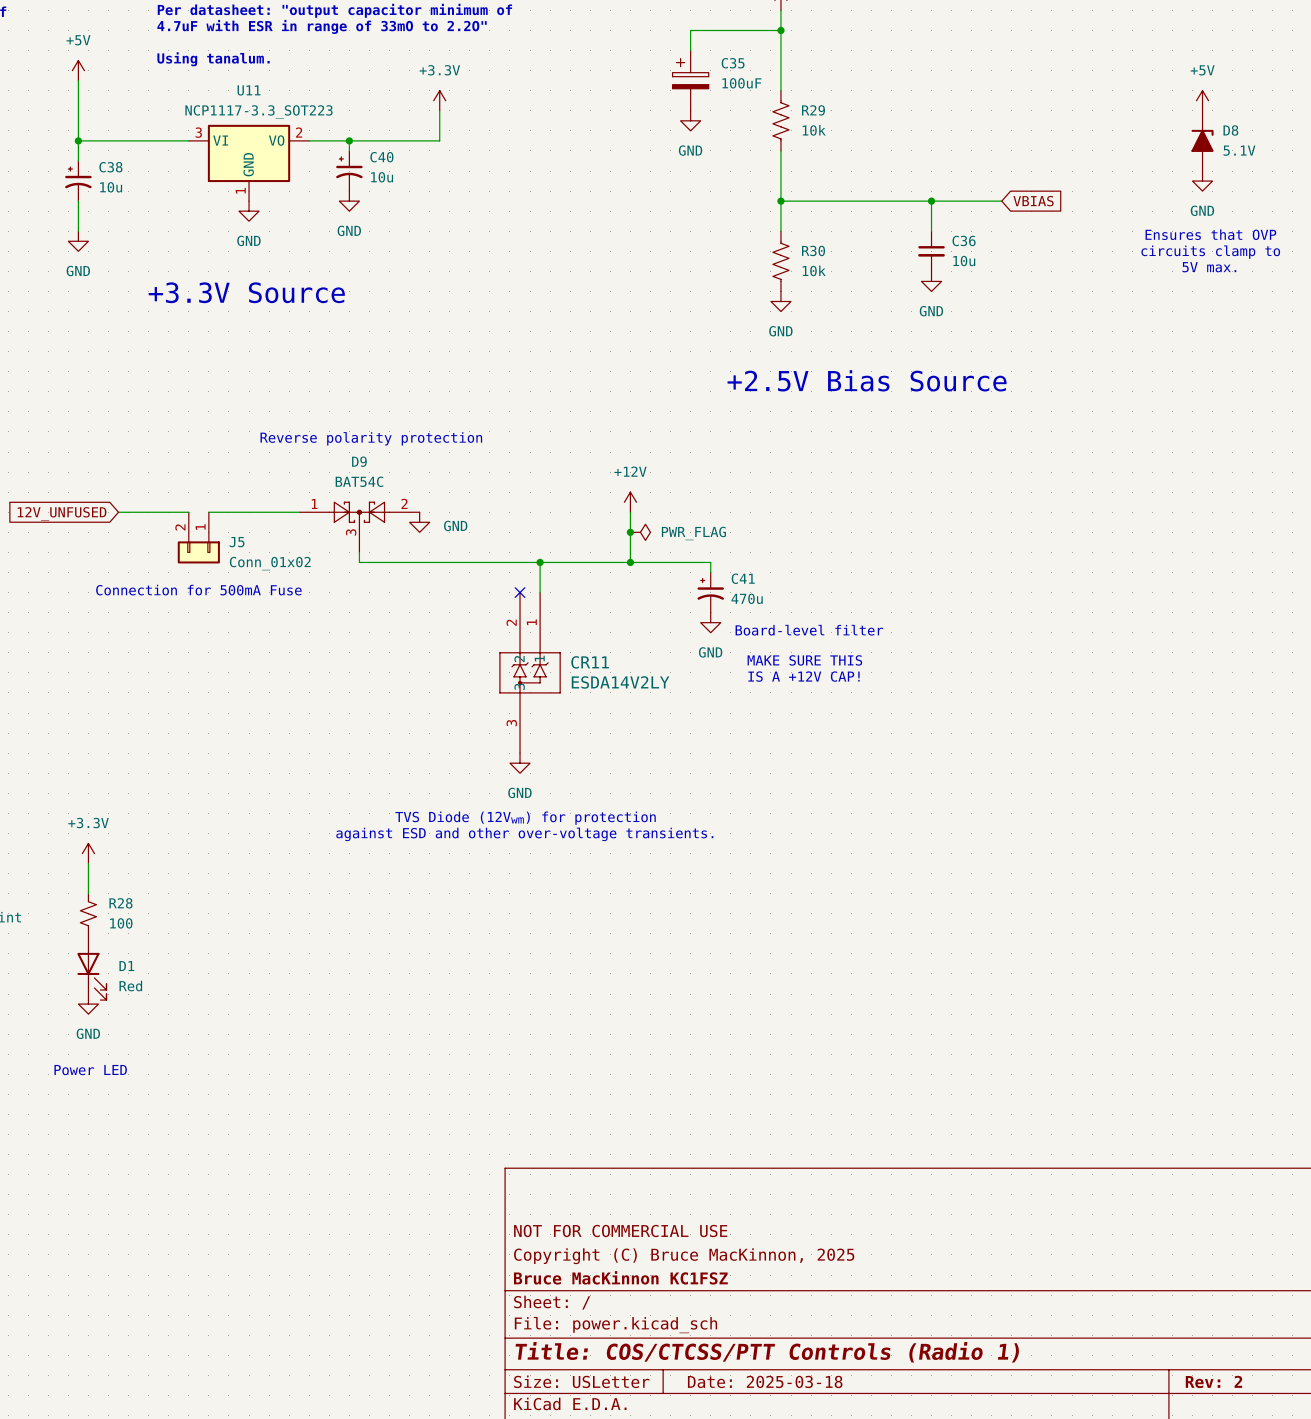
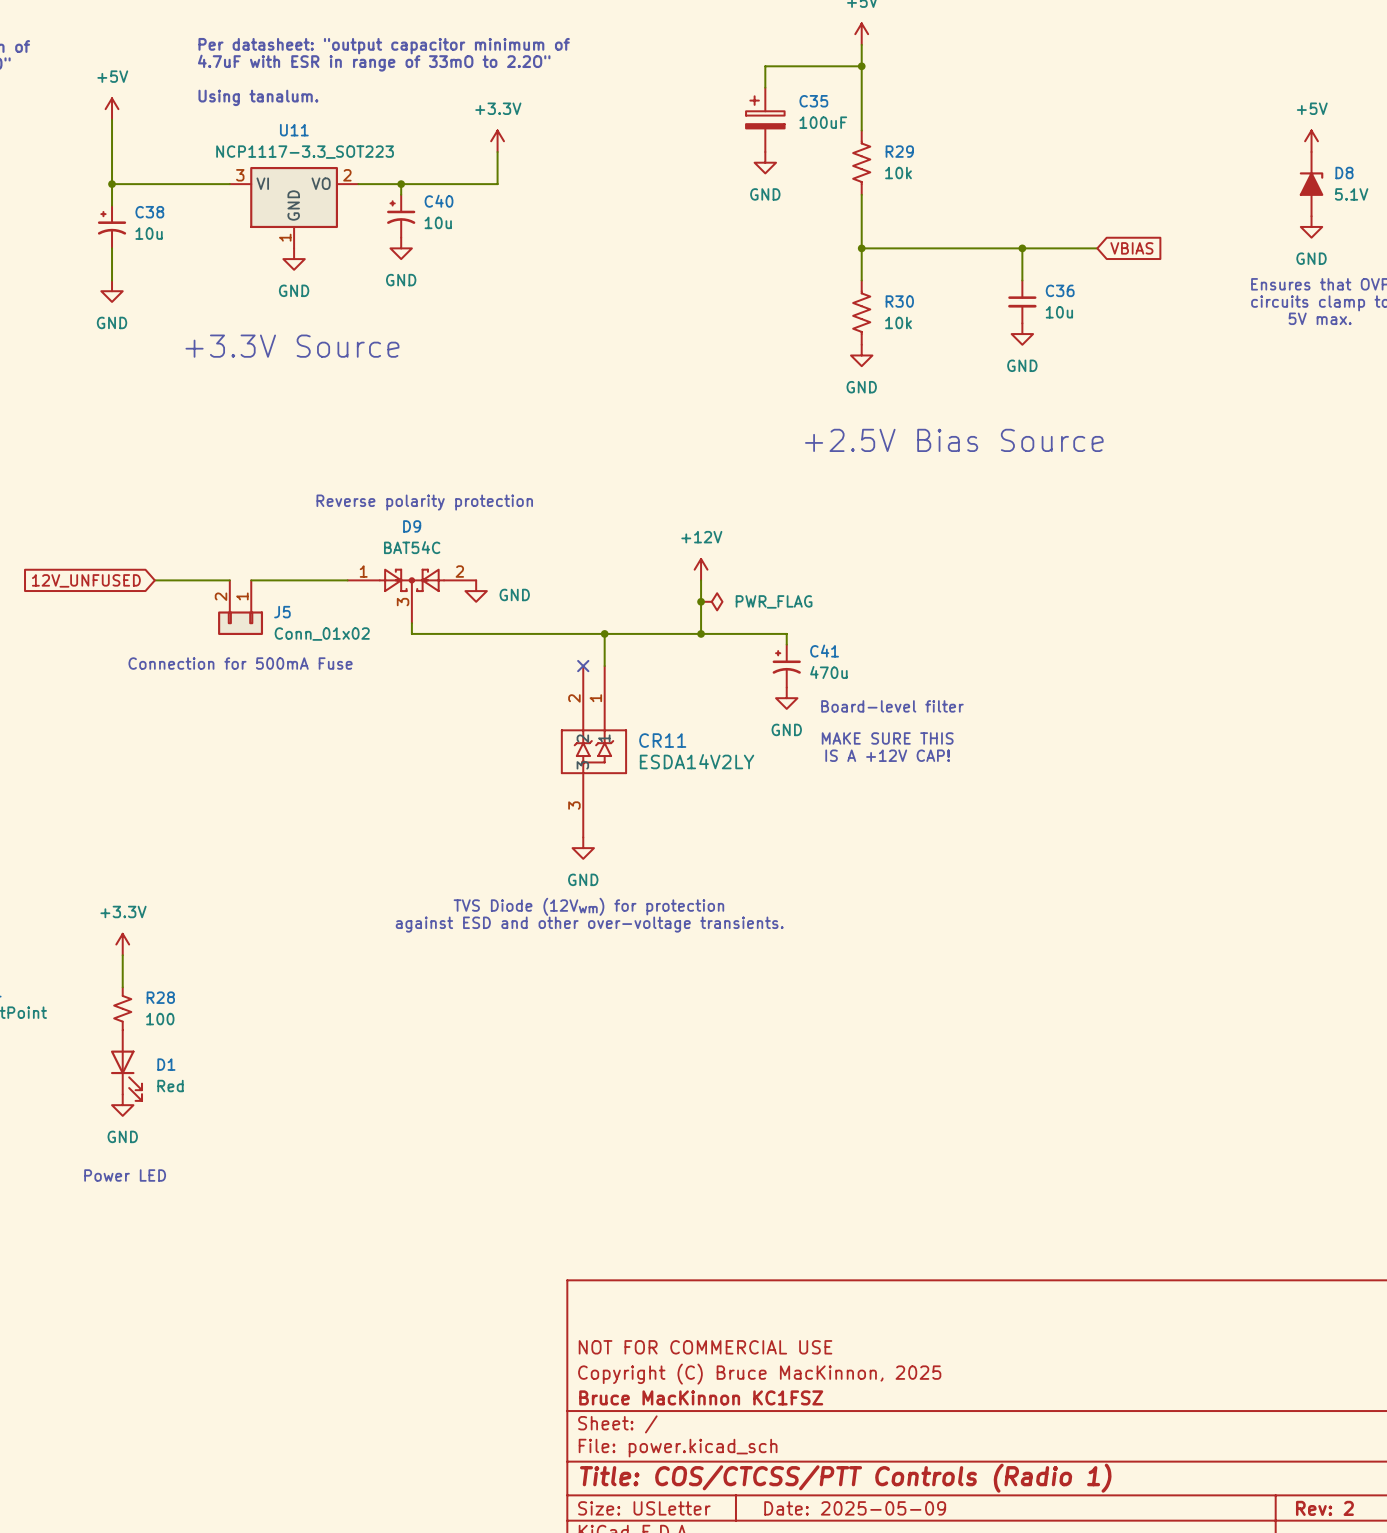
title block: Date: 2025-03-18 (765, 1381) -> Date: 2025-05-09 (855, 1508)

